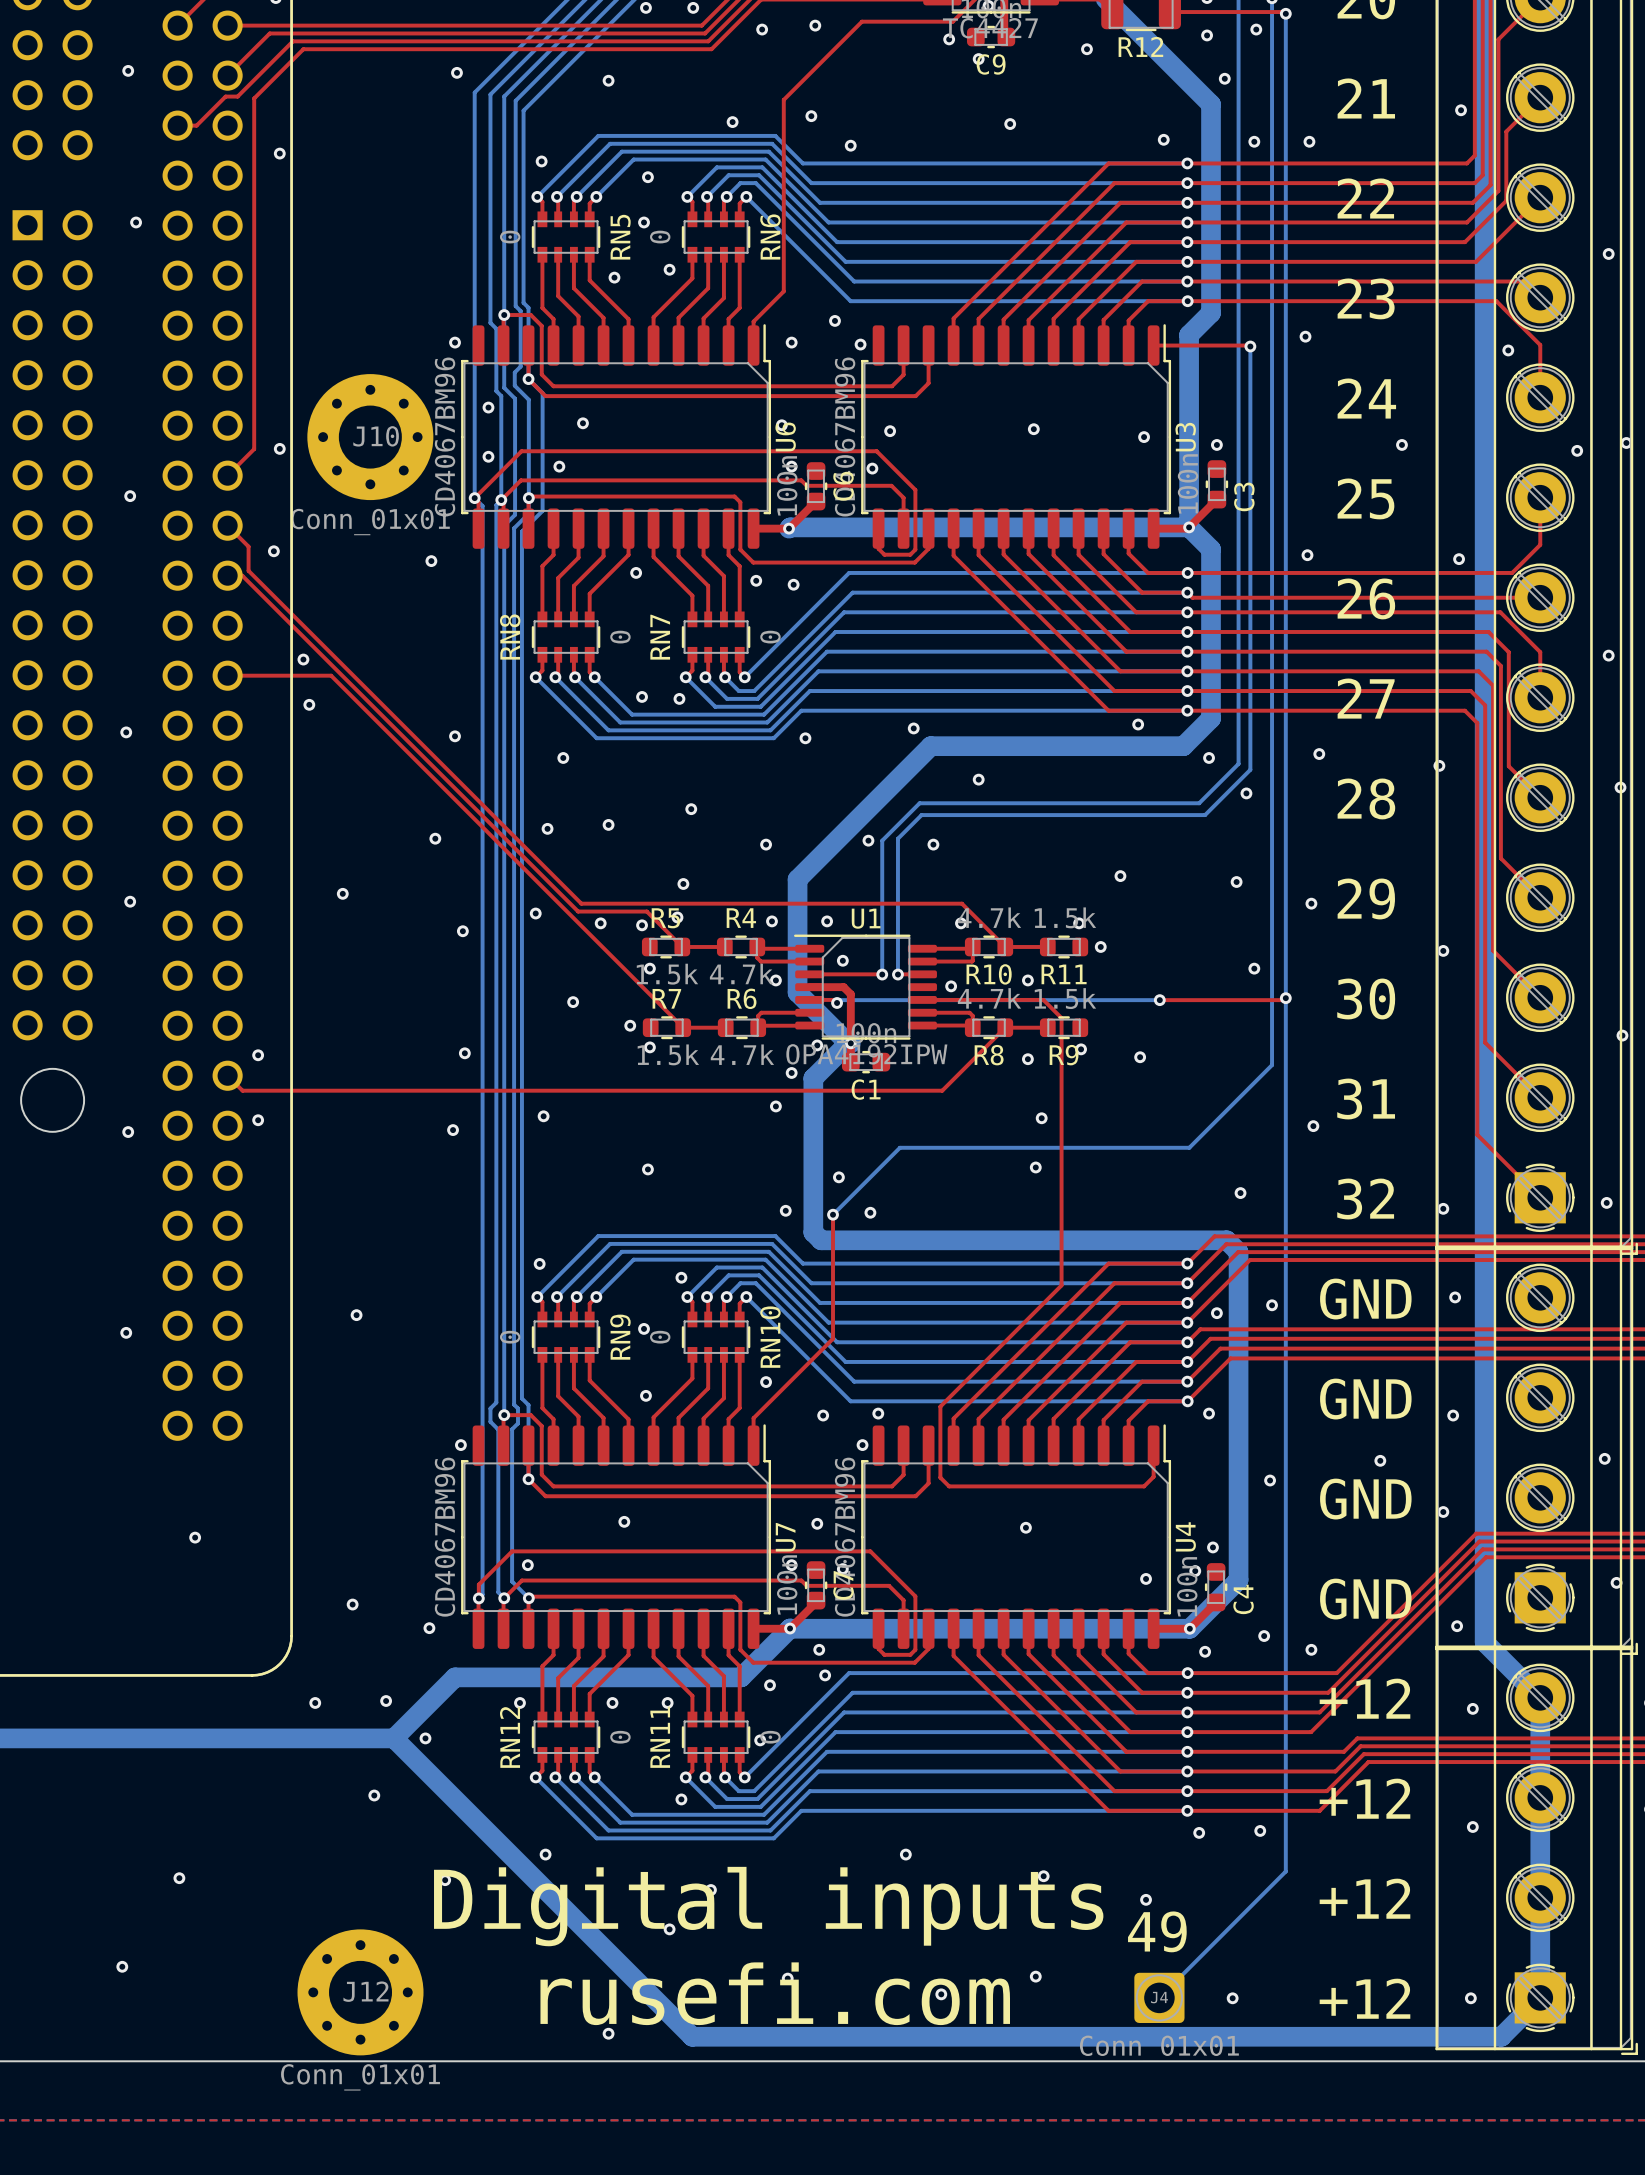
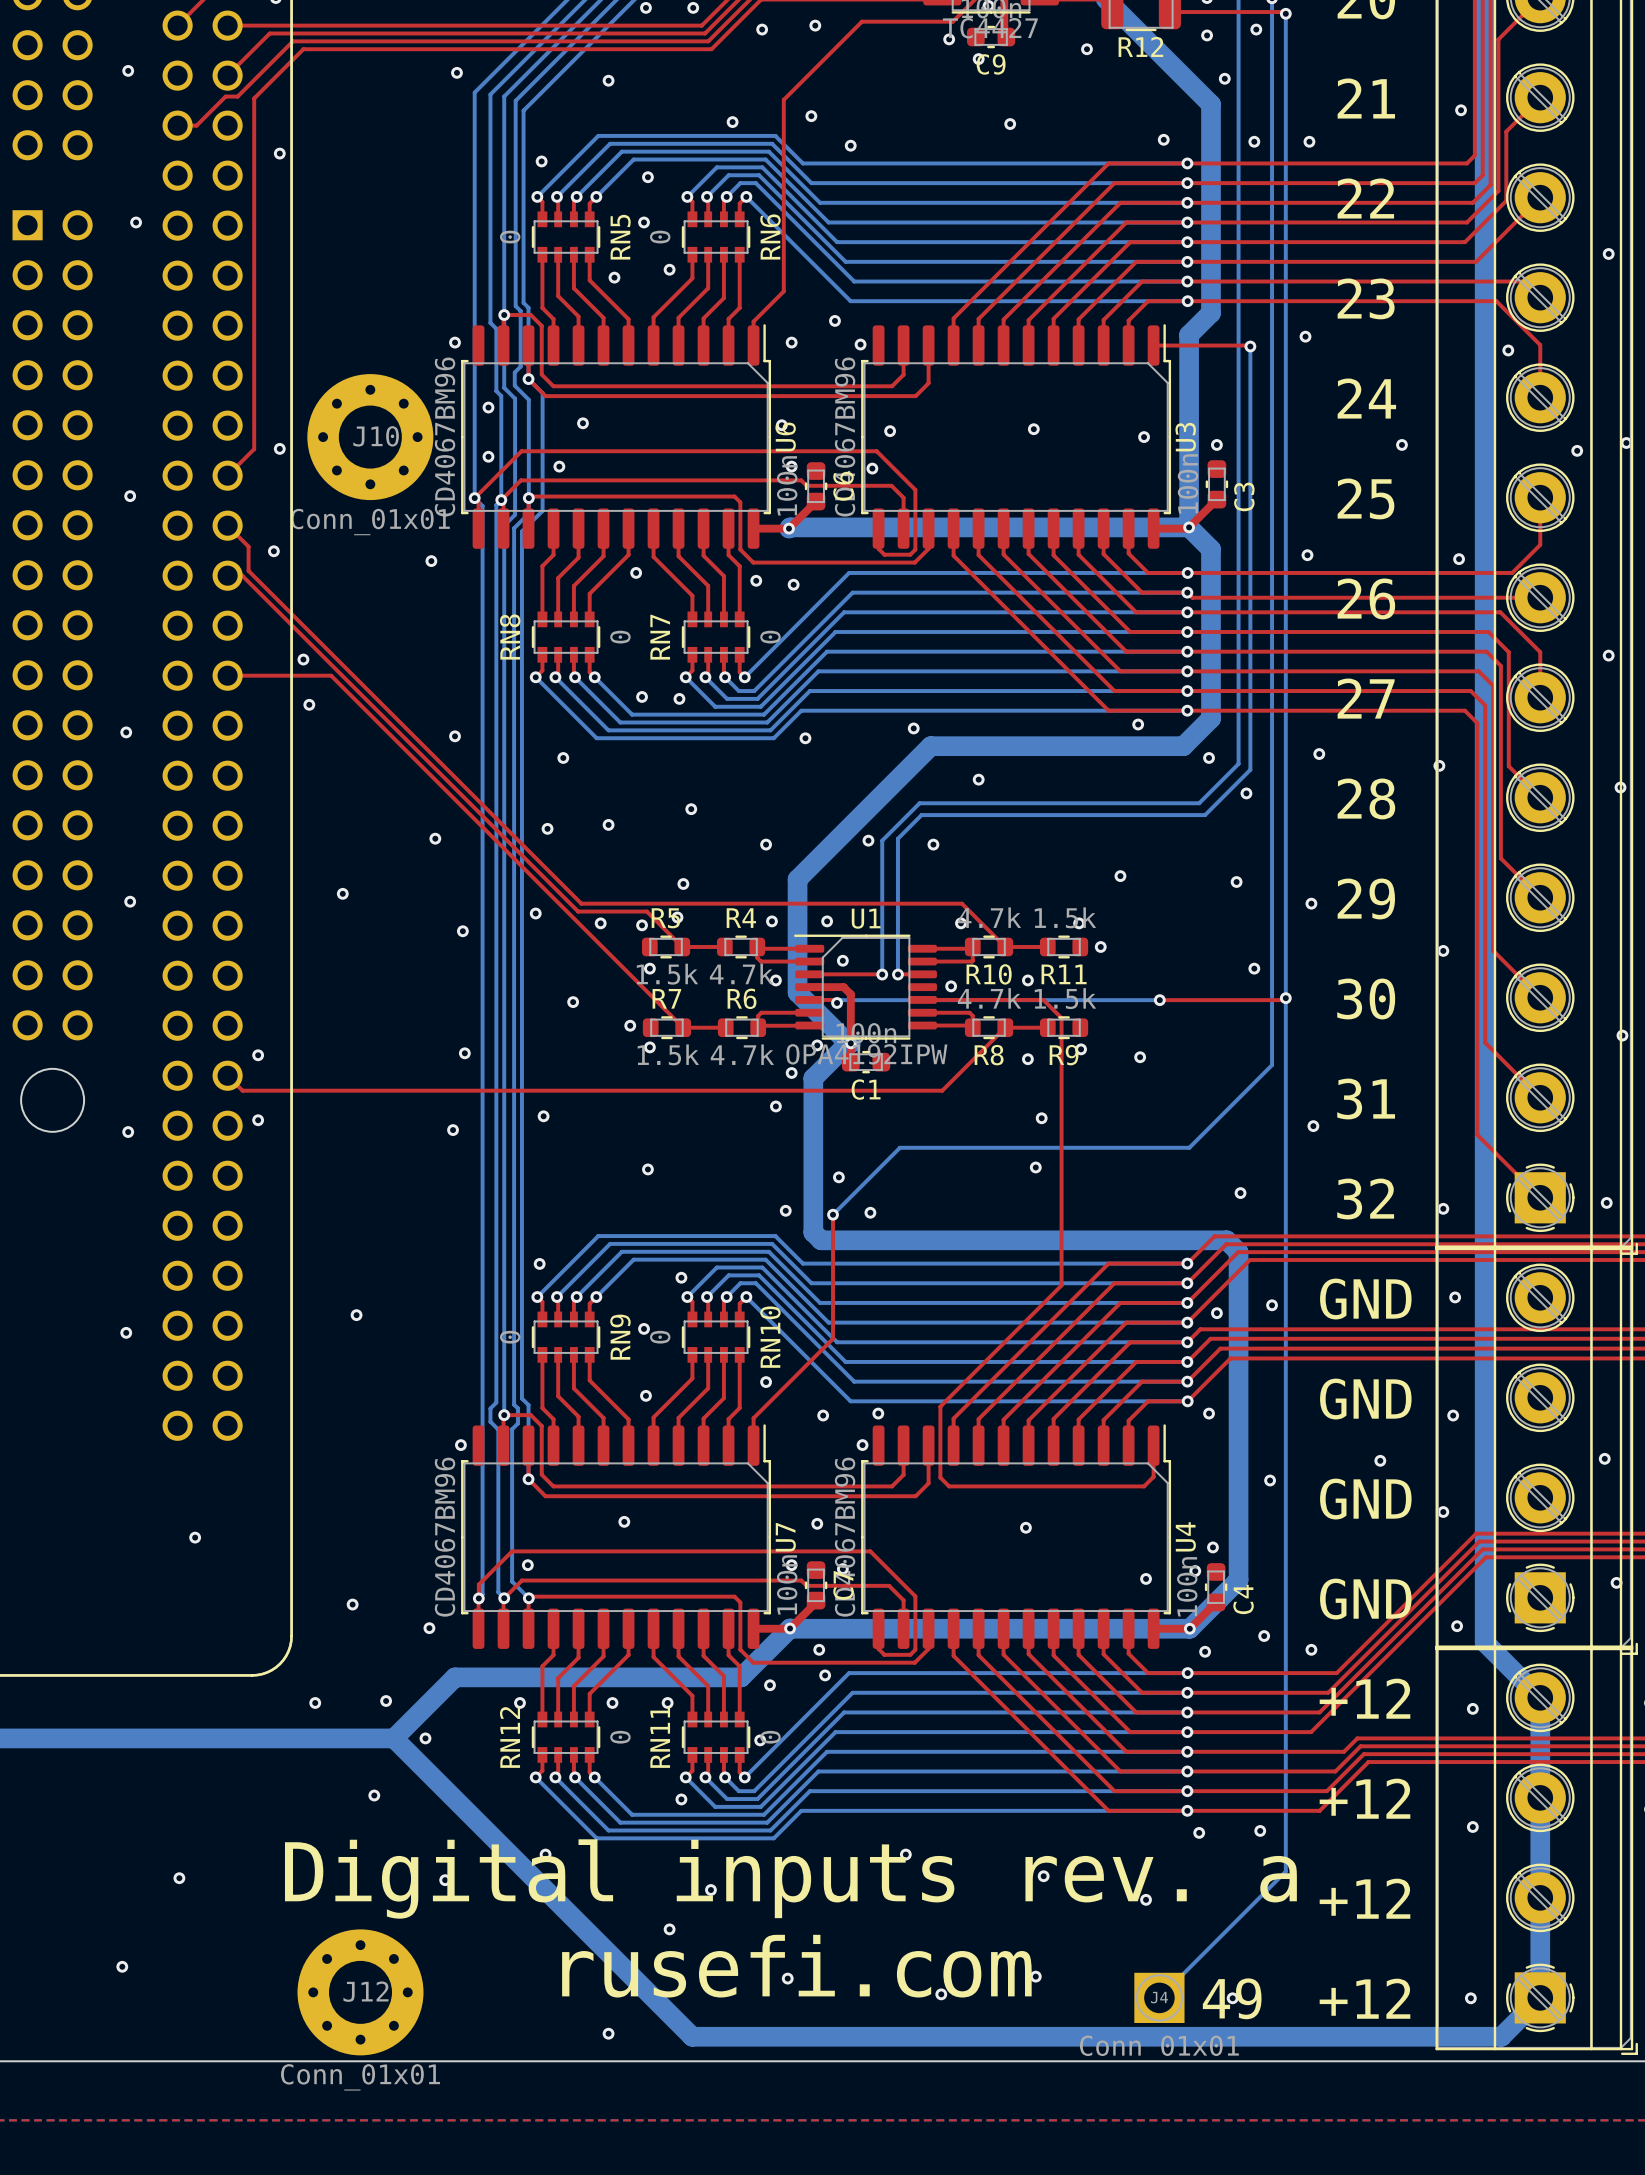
text: Digital inputs (768, 1906) -> Digital inputs rev. a (790, 1878)
text position: 49 (1157, 1931) -> 49 (1232, 1998)
J4 footprint: [1134, 1972, 1185, 2023] -> [1134, 1972, 1185, 2023]
text position: rusefi.com (775, 1993) -> rusefi.com (796, 1966)

